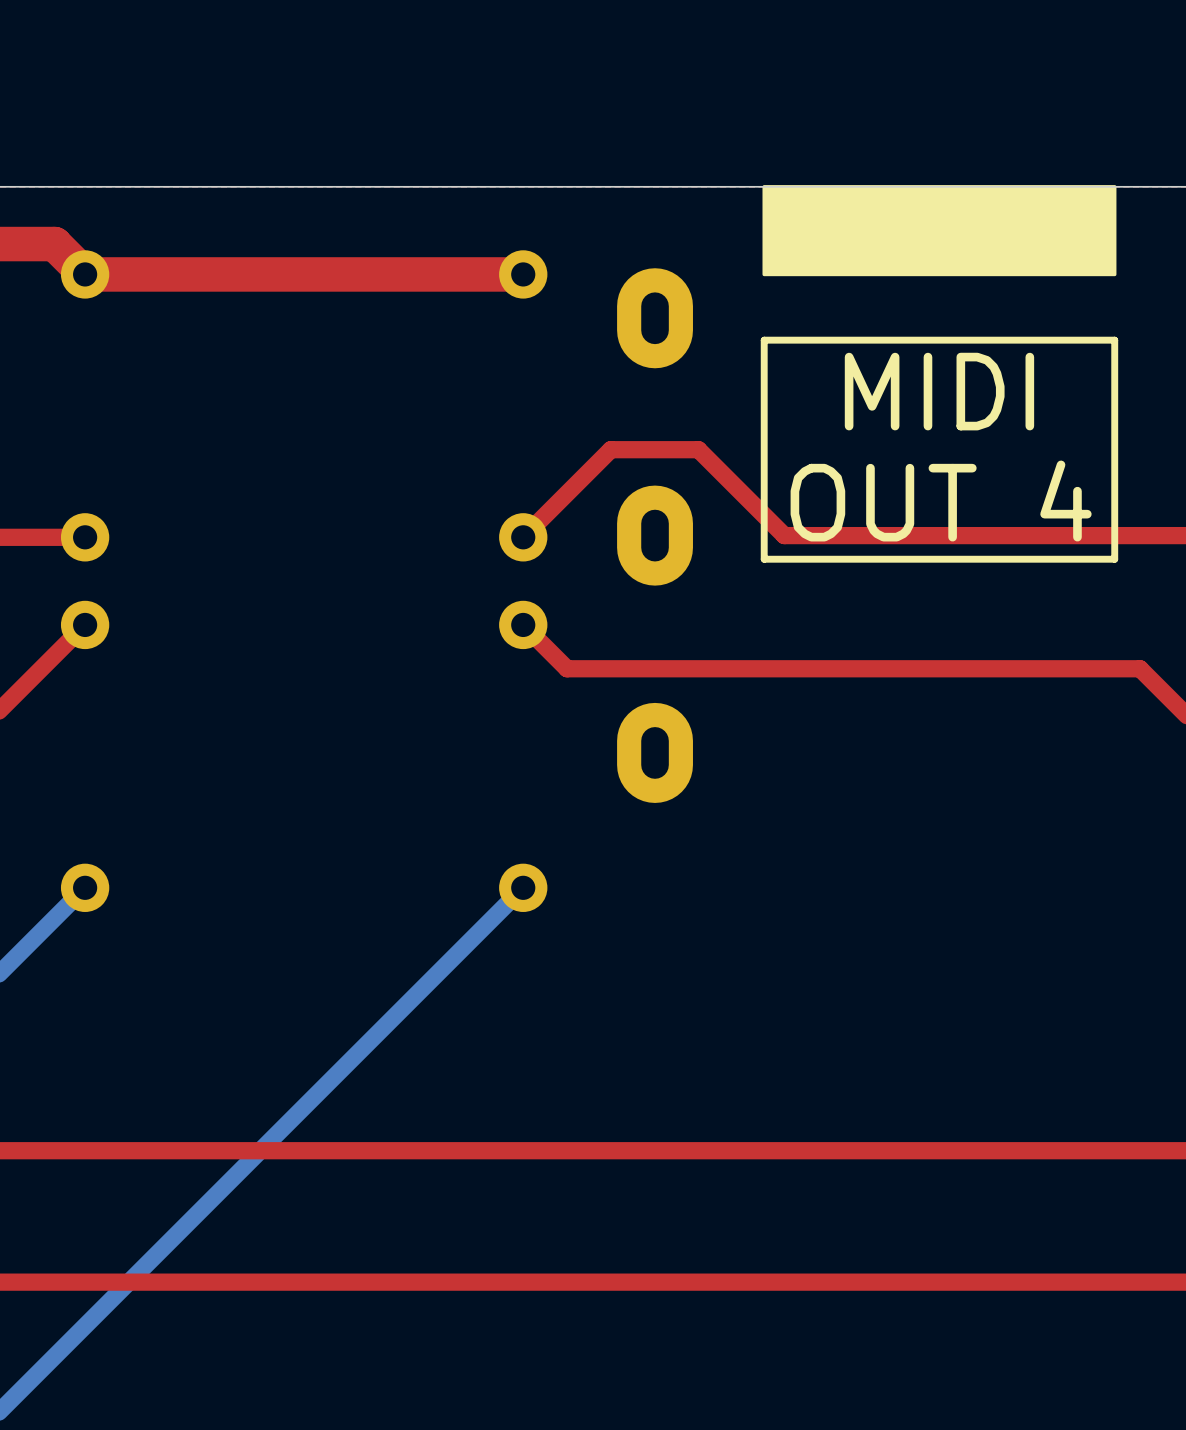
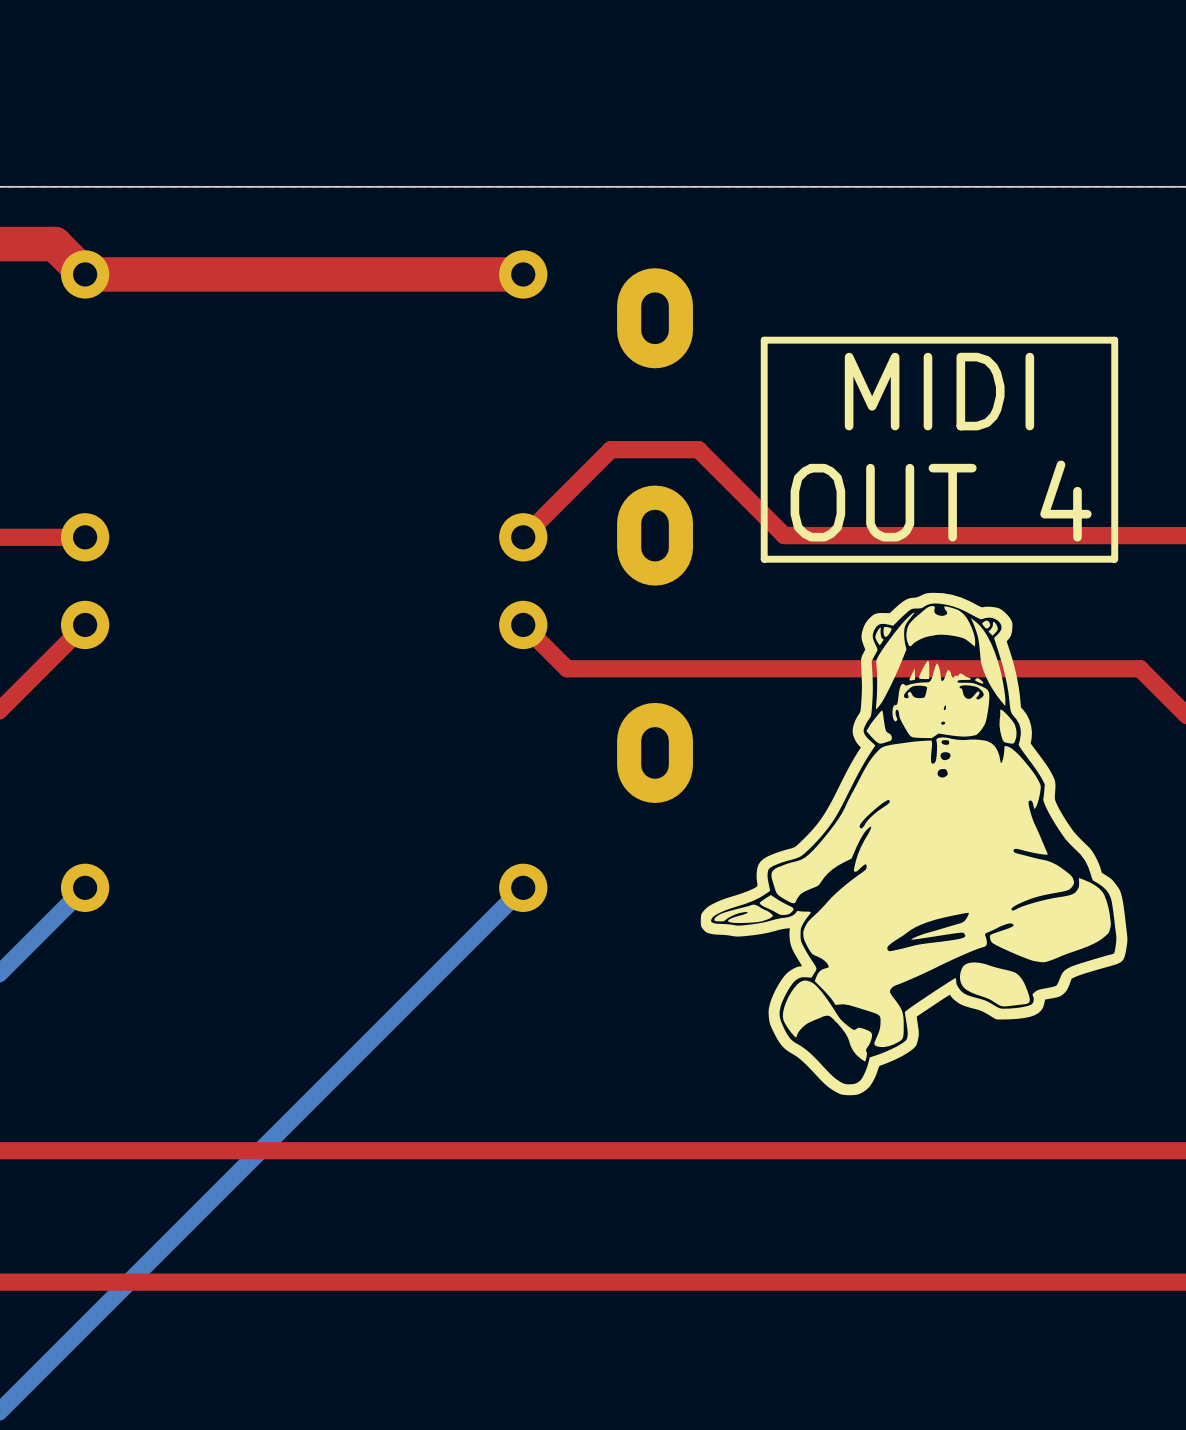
drawing: [762, 185, 1117, 277] -> none
drawing: none -> [700, 592, 1128, 1096]

